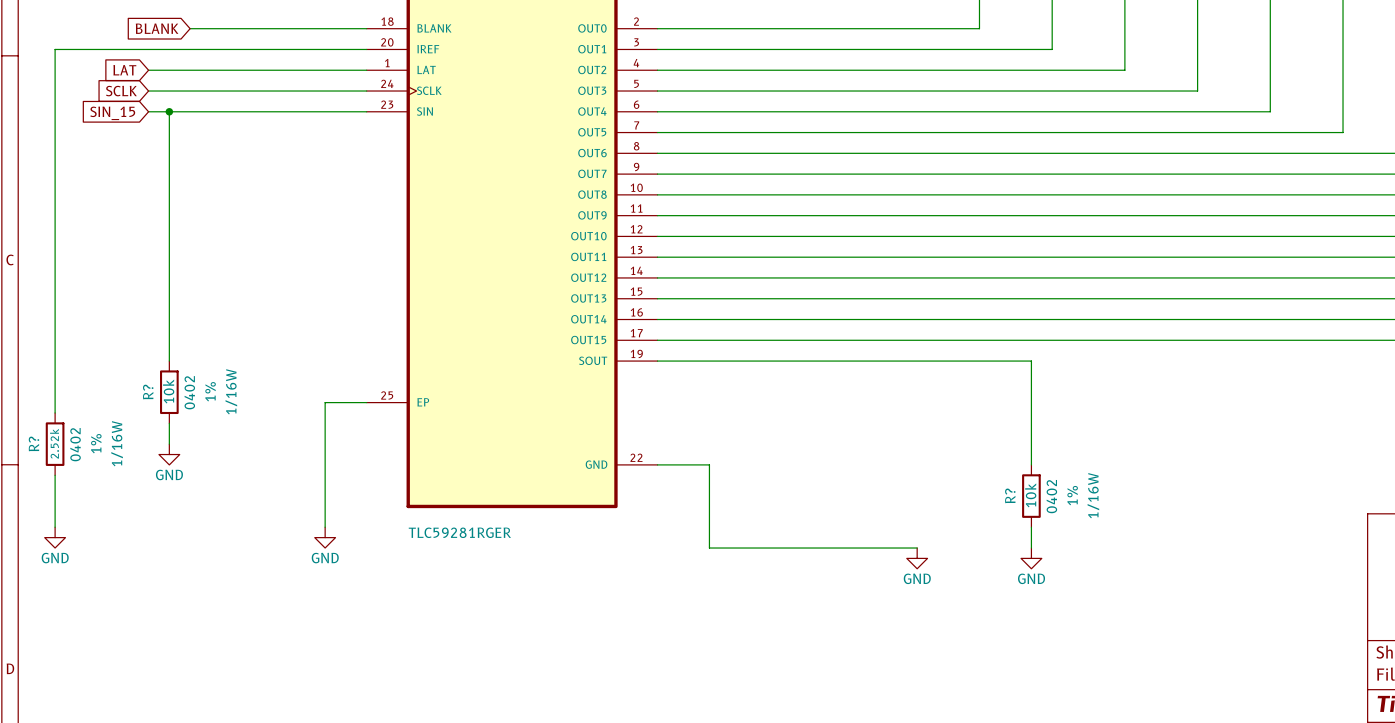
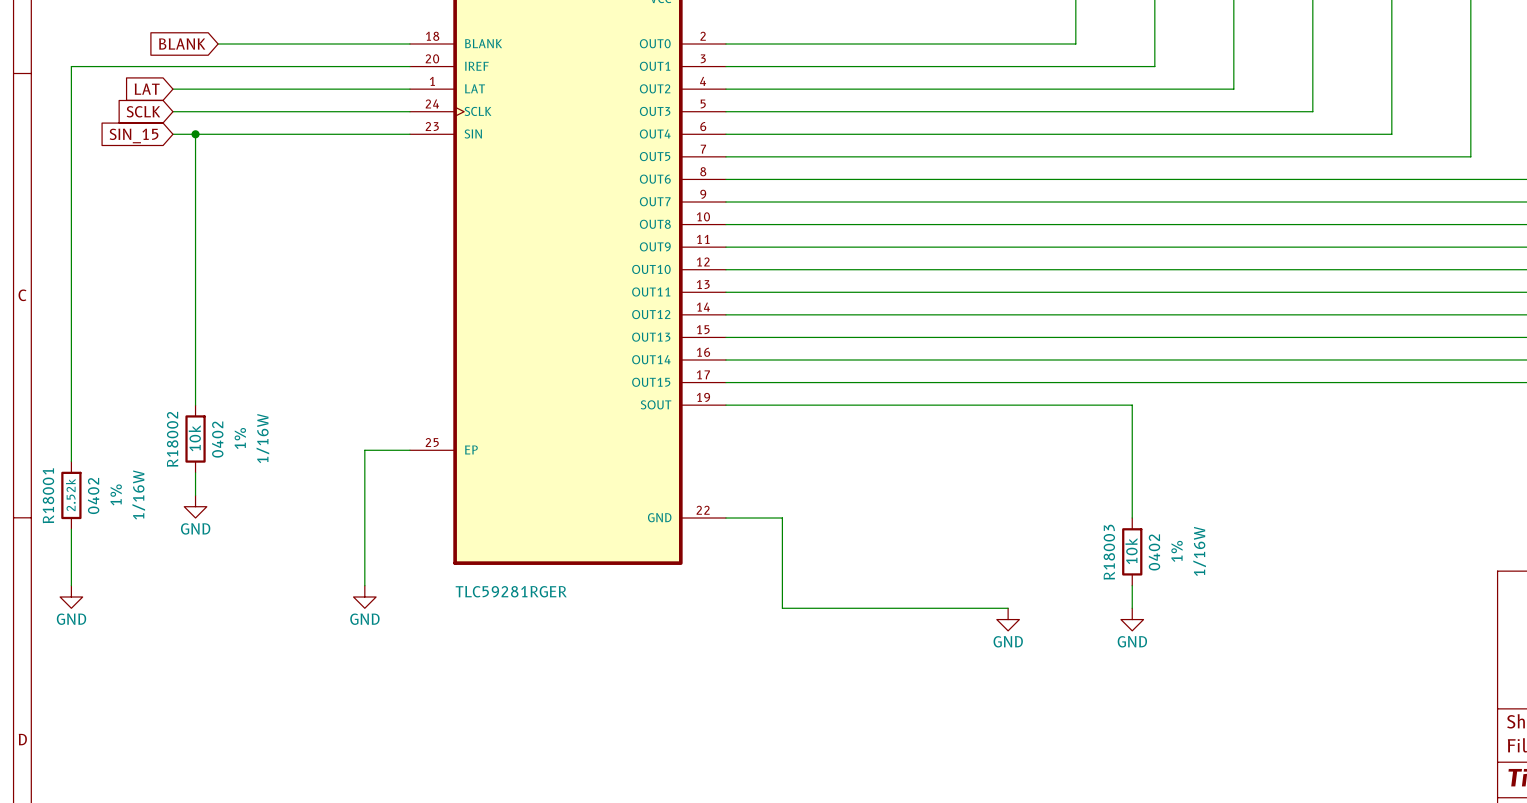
R? name: R? (148, 392) -> R18002 (172, 439)
R? name: R? (33, 443) -> R18001 (48, 495)
R? name: R? (1010, 495) -> R18003 (1109, 552)

